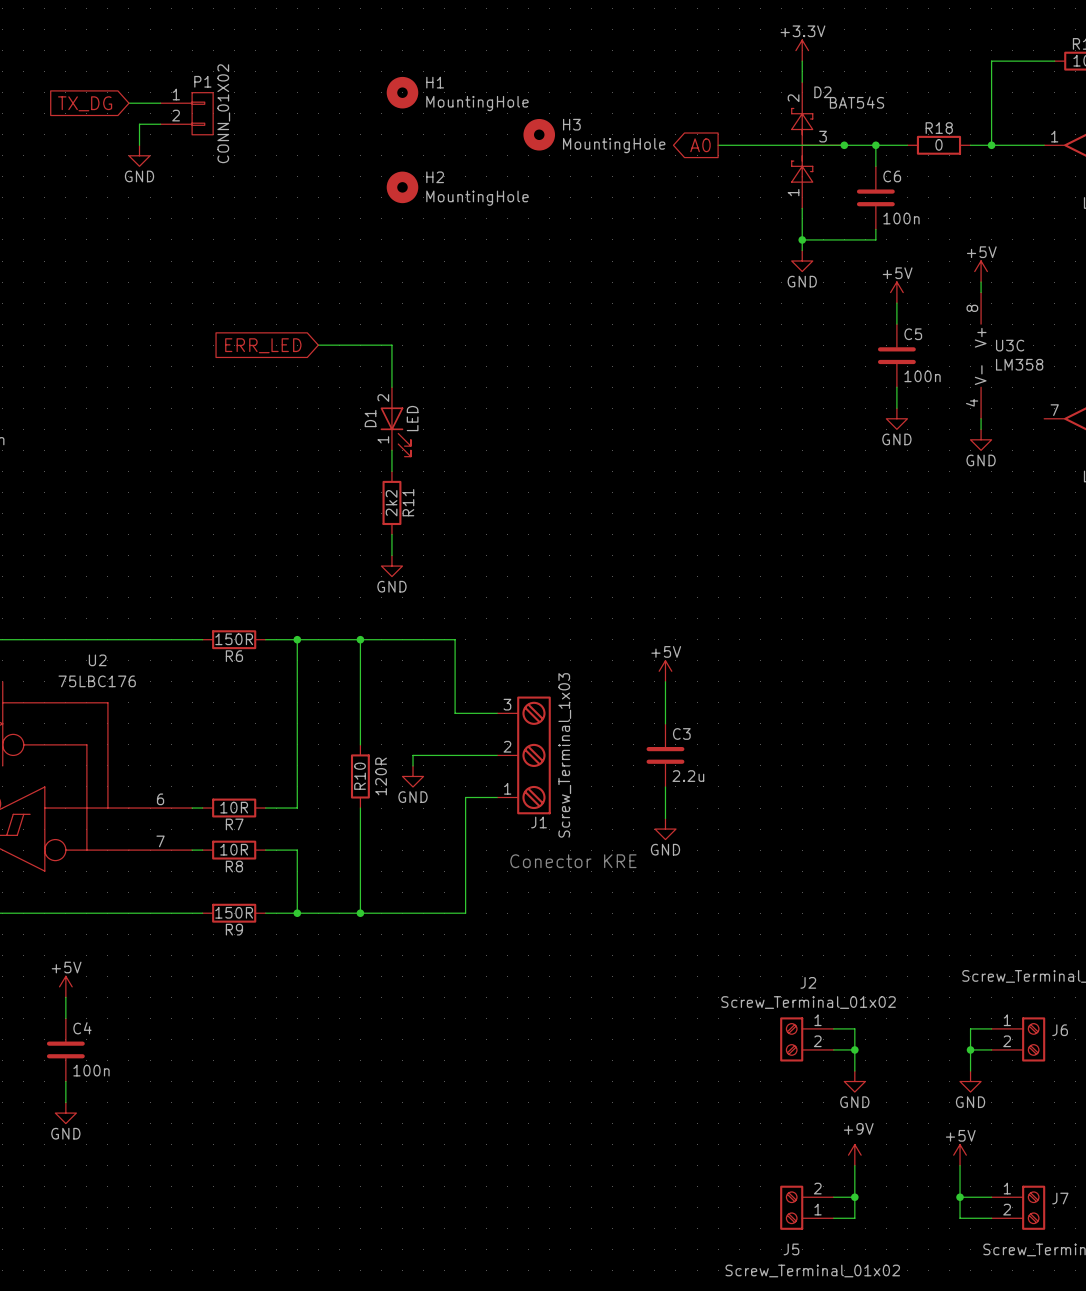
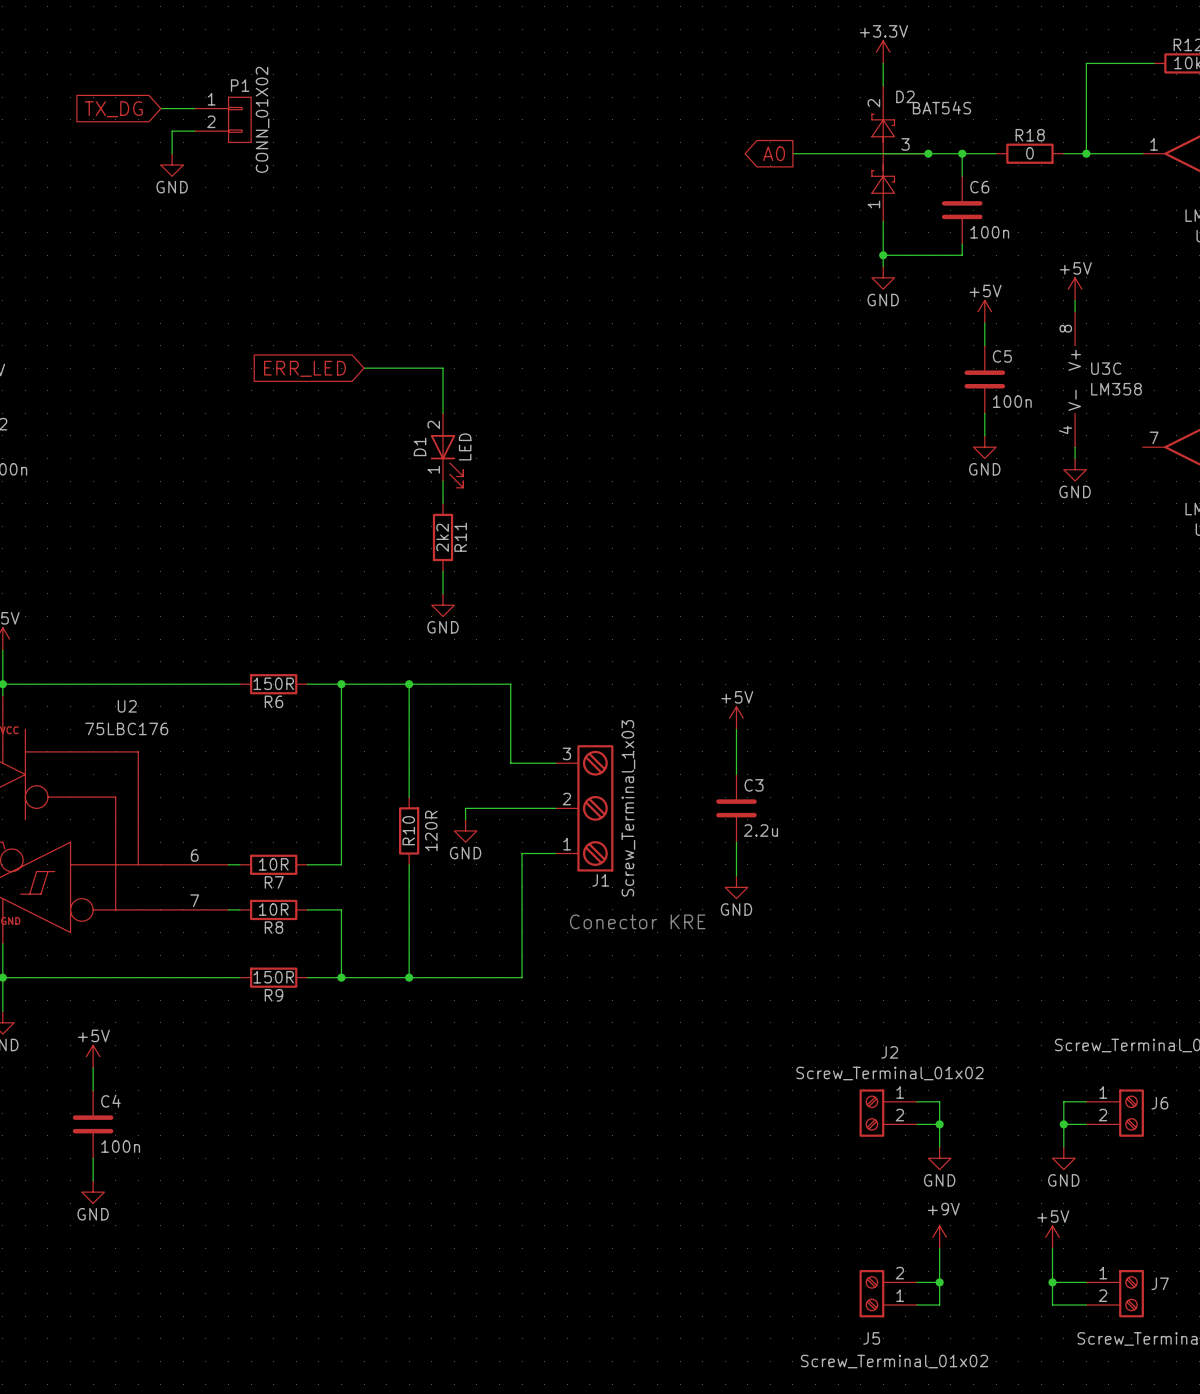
H1: MountingHole (402, 92) -> none
H3: MountingHole (539, 134) -> none
H2: MountingHole (402, 187) -> none

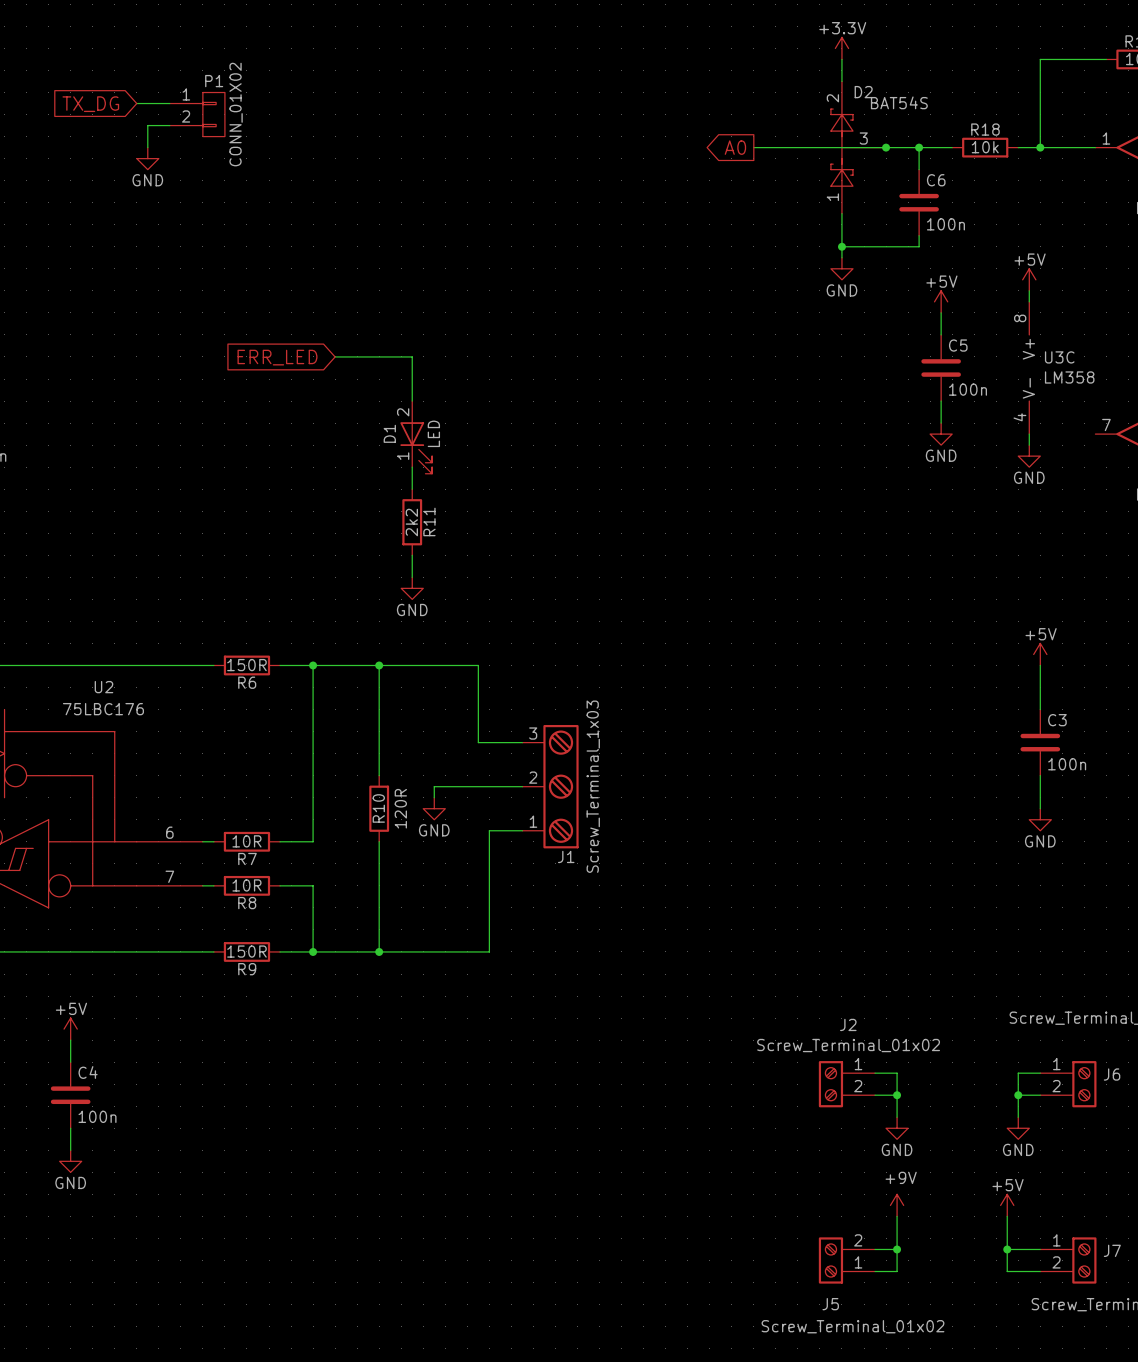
R18 value: 0 (1029, 153) -> 10k (985, 147)
power symbol: none -> +5V (1040, 654)
wire: none -> (1040, 665) (1040, 709)
power symbol: +5V (736, 718) -> none
wire: (736, 729) (736, 774) -> none
wire: none -> (1040, 775) (1040, 808)
C3 position: (736, 808) -> (1040, 742)
C3 value: 2.2u (761, 830) -> 100n (1067, 764)
wire: (736, 842) (736, 876) -> none
power symbol: none -> GND (1040, 819)
power symbol: GND (736, 887) -> none
text: Conector KRE (637, 921) -> none

